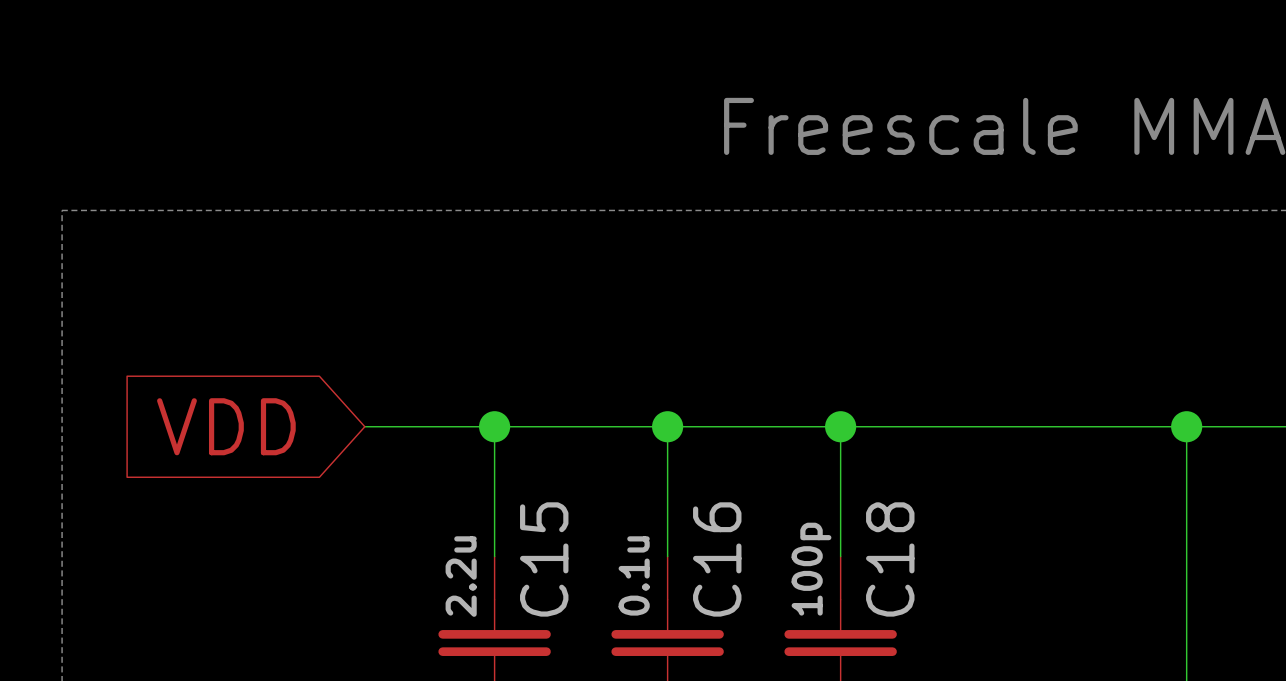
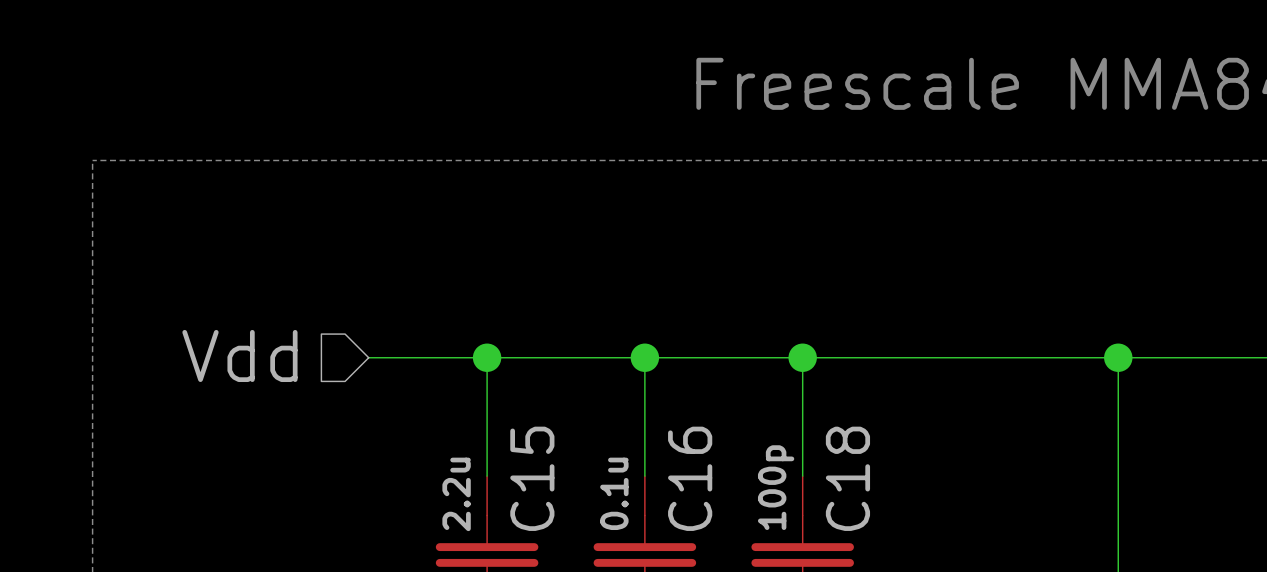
hierarchical label: none -> Vdd (239, 355)
global label: VDD (226, 426) -> none

